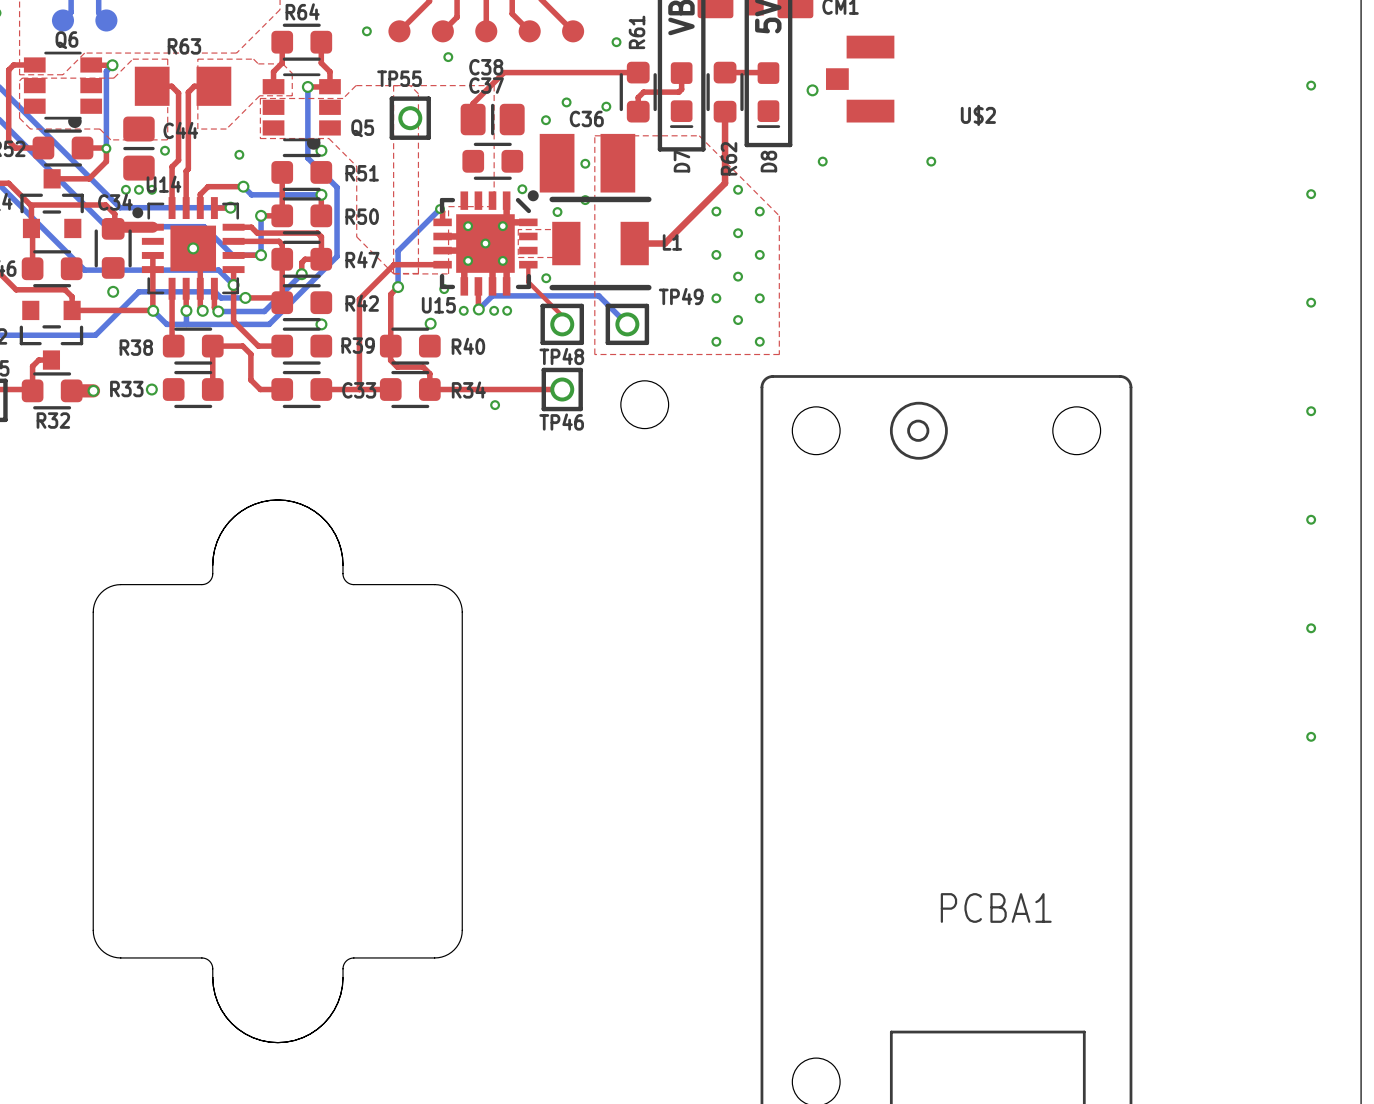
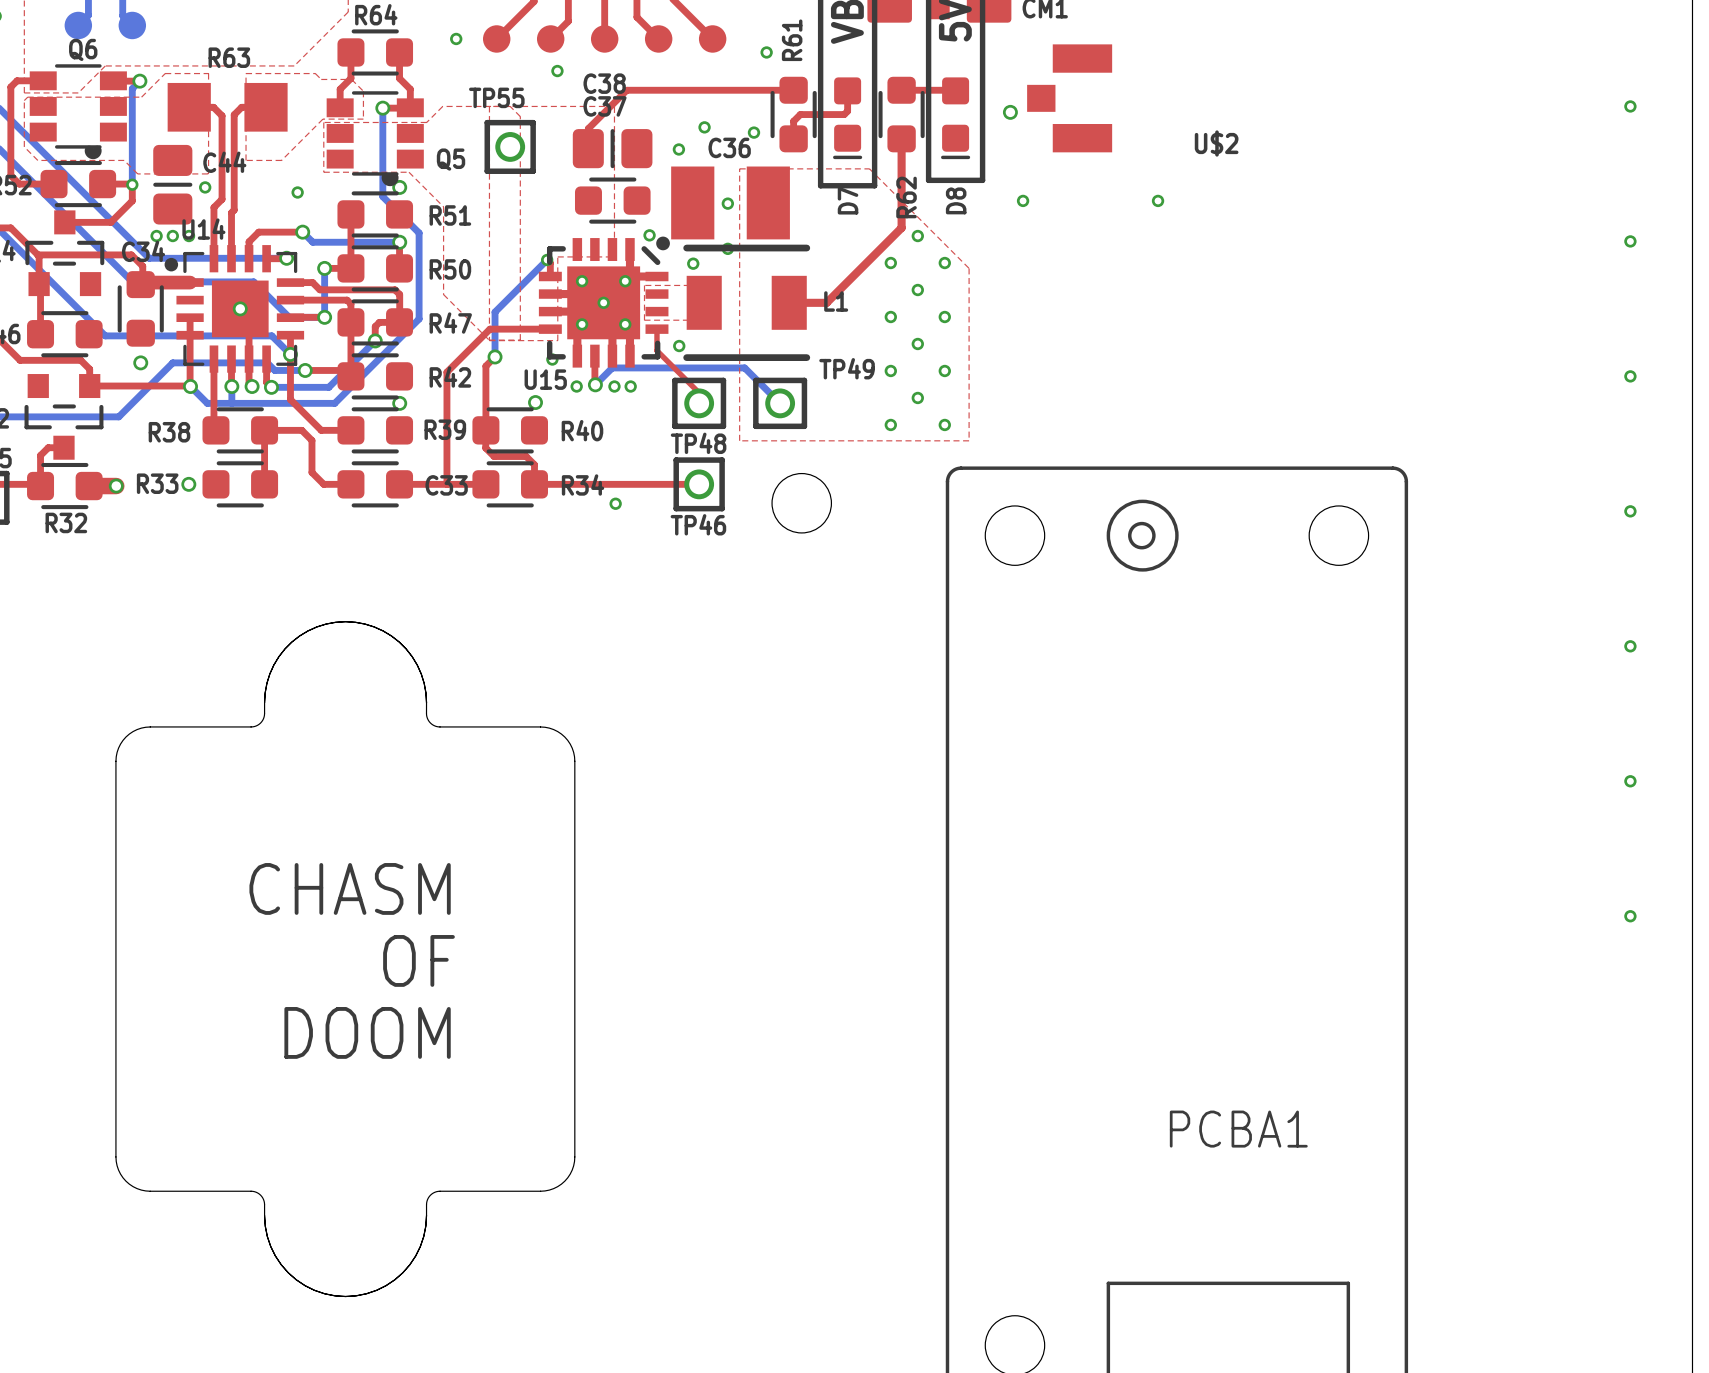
text: none -> CHASM (350, 888)
text: none -> OF (418, 960)
text: none -> DOOM (367, 1032)

